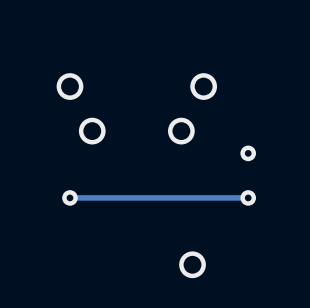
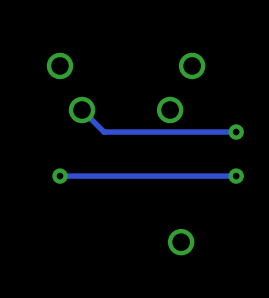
track: none -> (82, 110) (104, 132) (236, 132)

